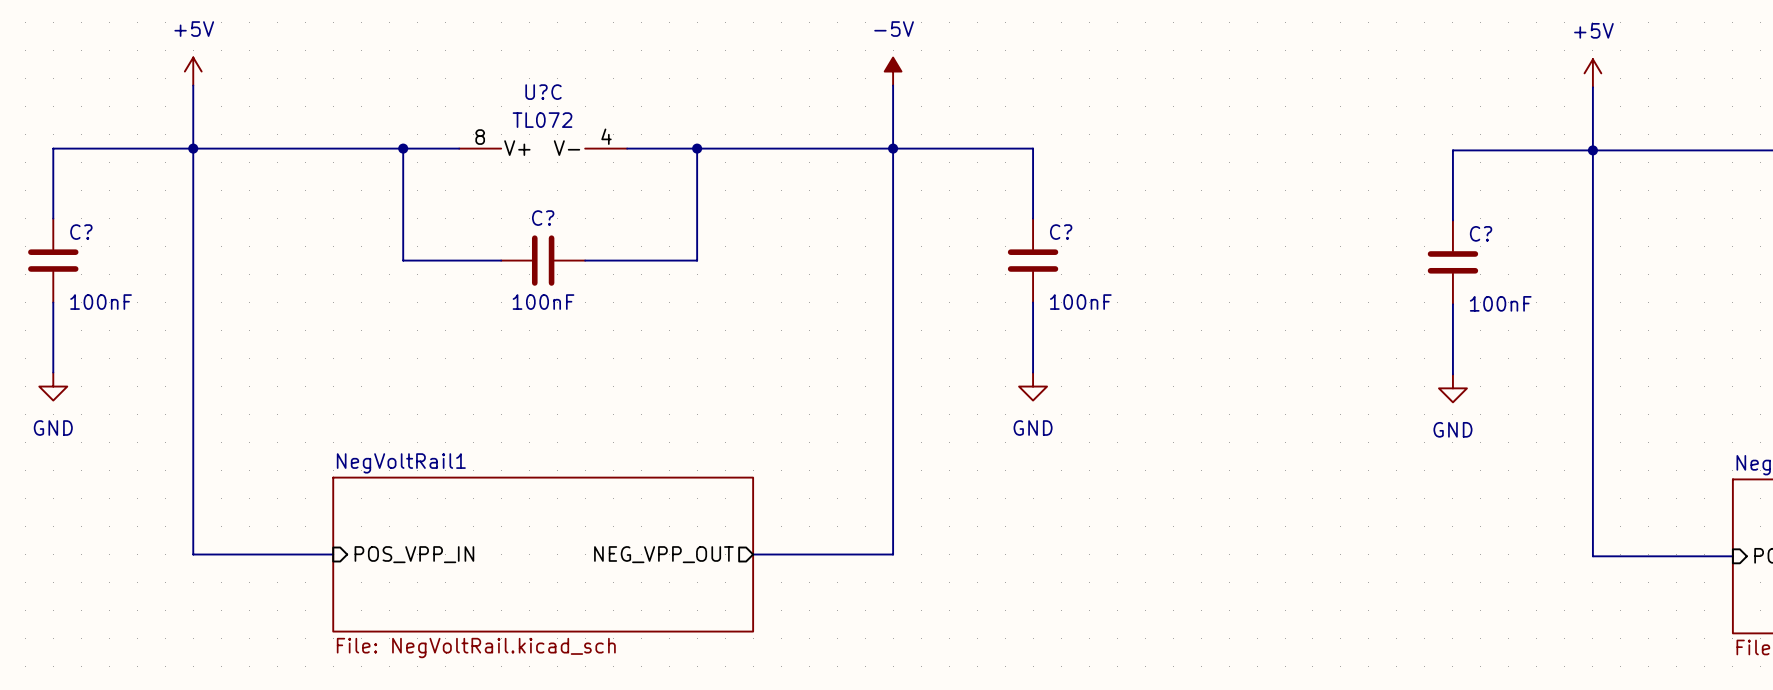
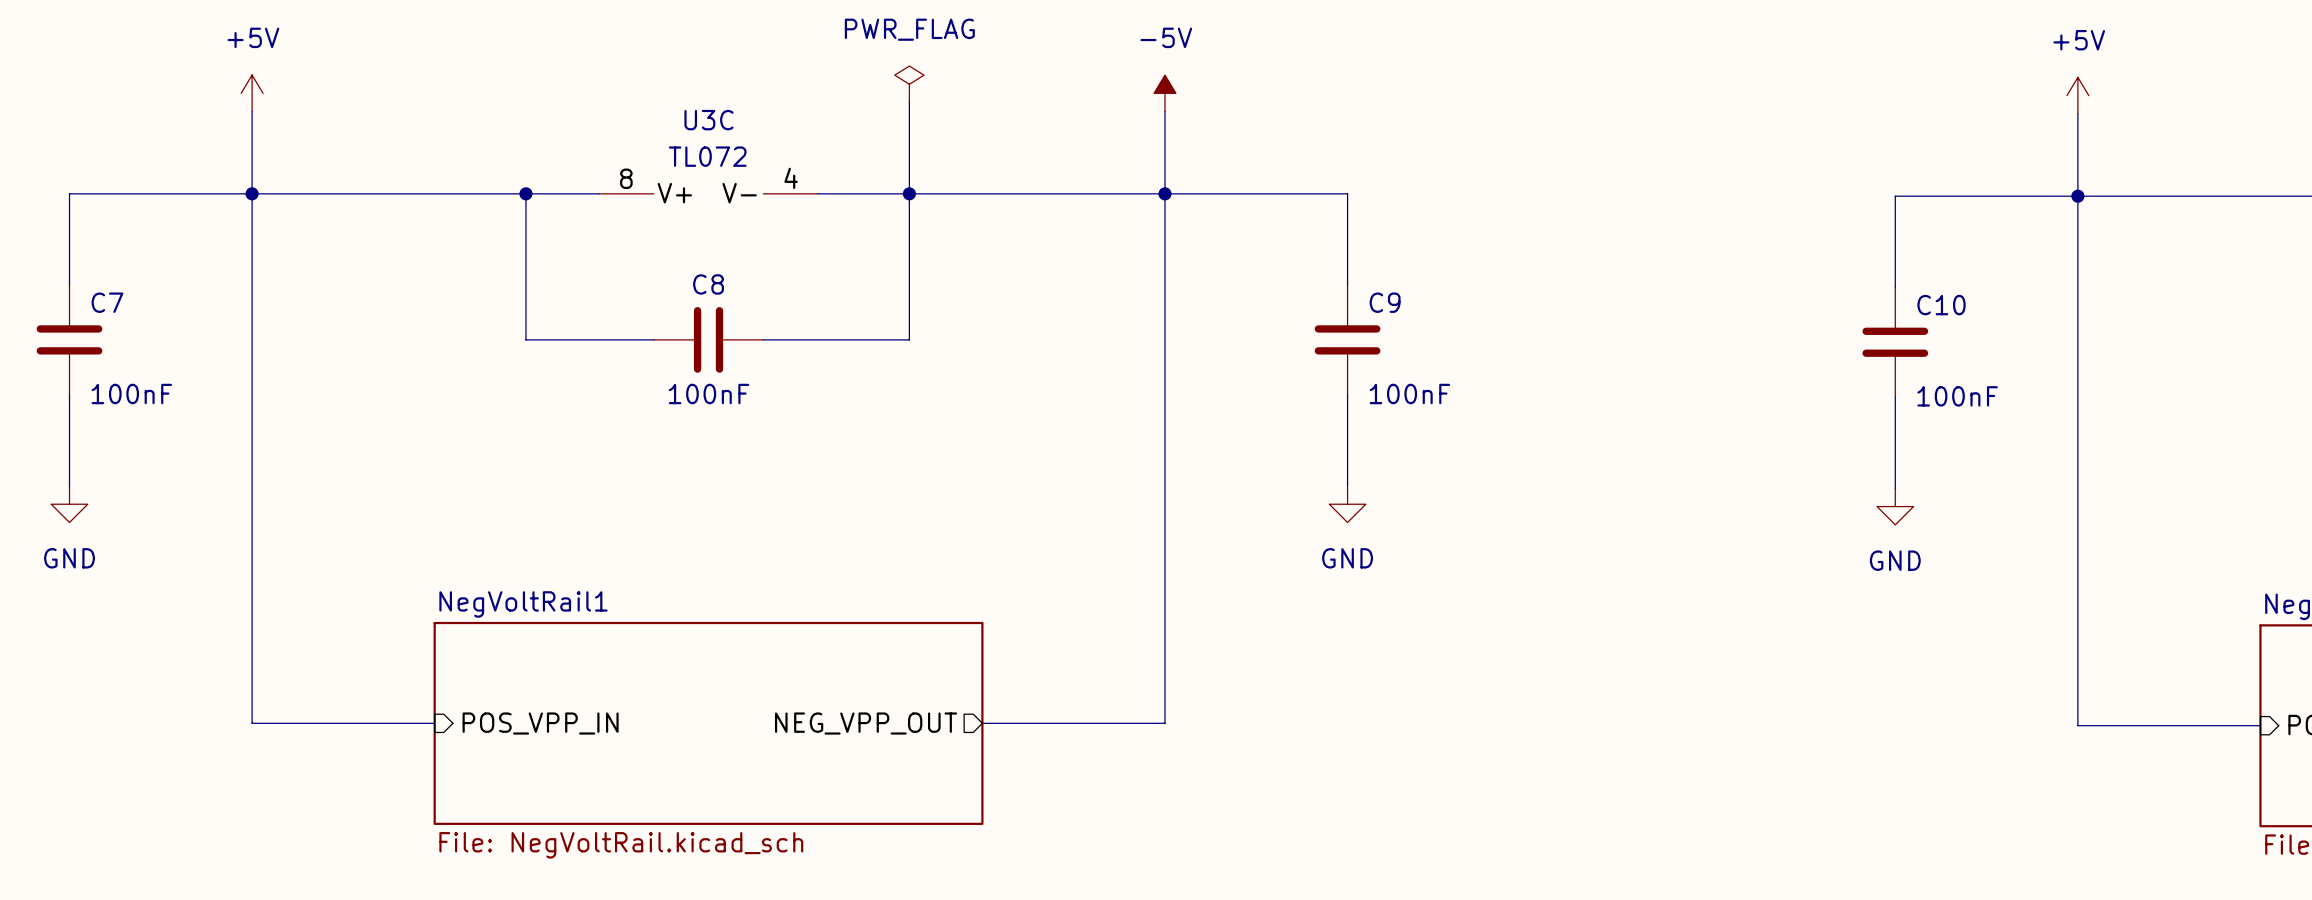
power symbol: none -> PWR_FLAG (909, 84)
wire: none -> (909, 102) (909, 193)
U?C name: U?C (543, 92) -> U3C (708, 120)
C? name: C? (543, 218) -> C8 (708, 284)
C? name: C? (81, 232) -> C7 (107, 302)
C? name: C? (1061, 232) -> C9 (1385, 302)
C? name: C? (1481, 233) -> C10 (1941, 305)

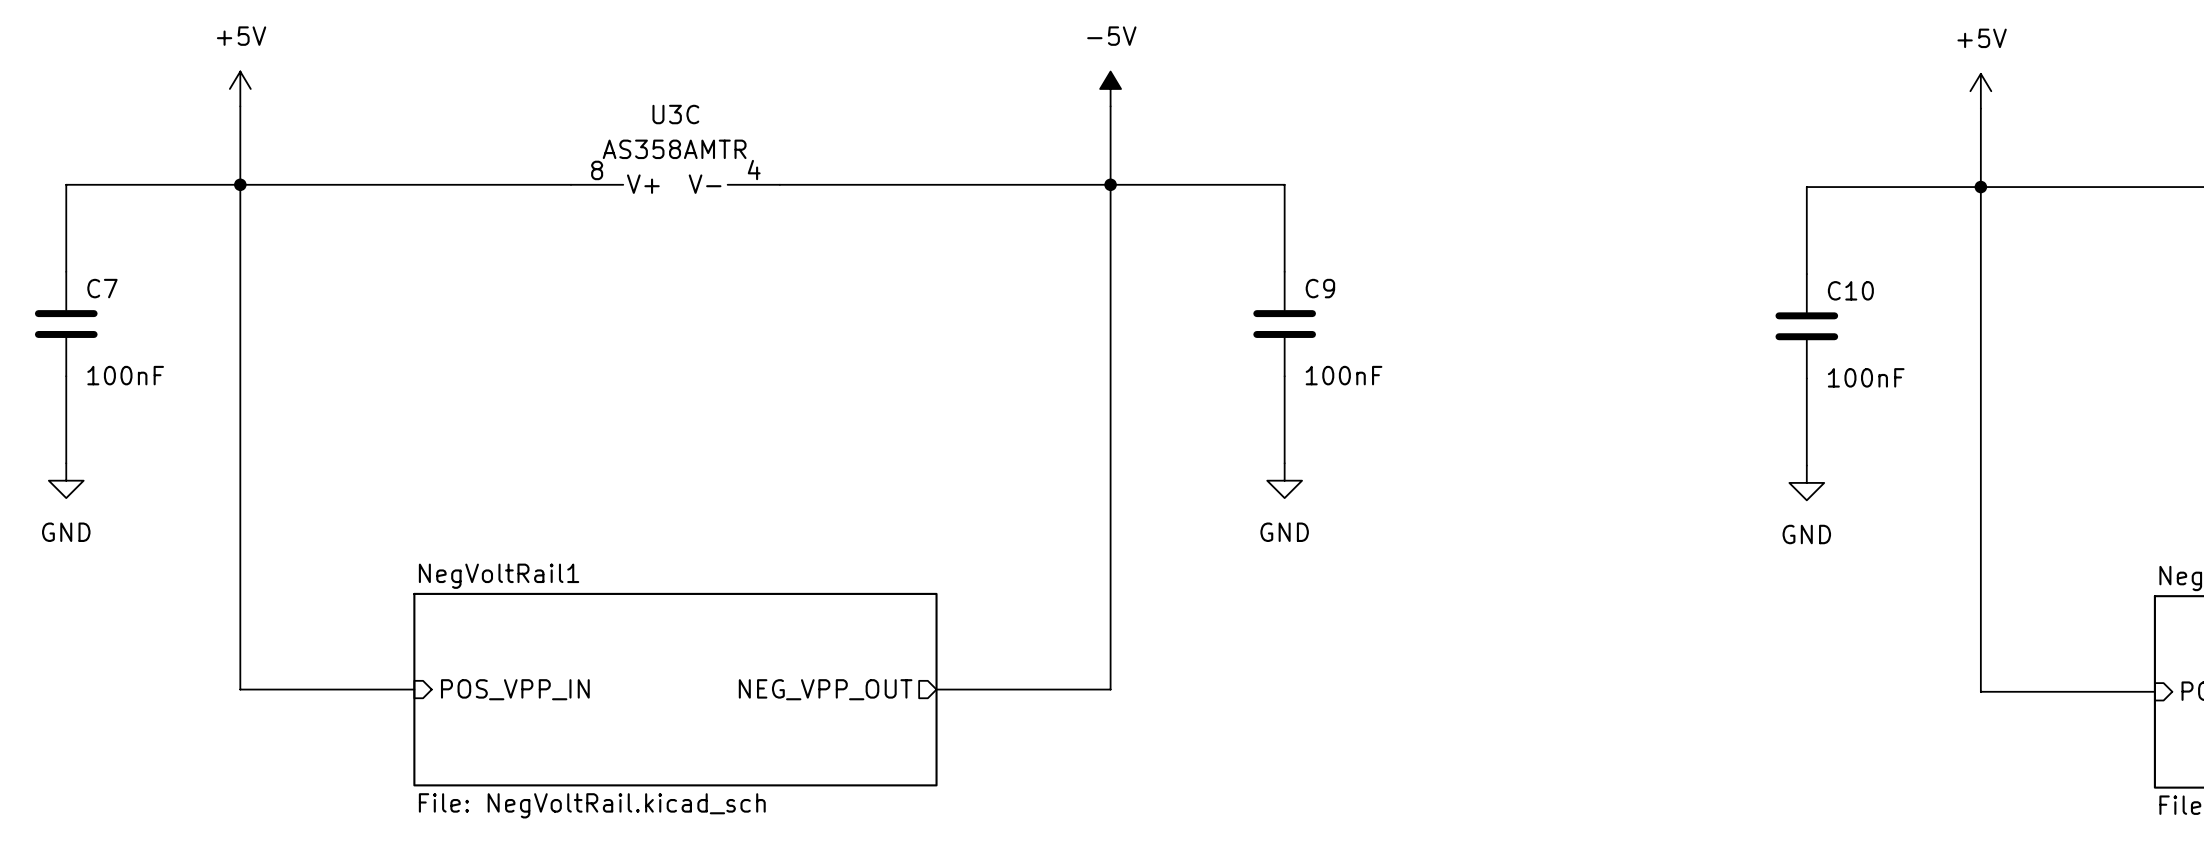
power symbol: PWR_FLAG (909, 84) -> none
wire: (909, 102) (909, 339) (763, 339) -> none
U3C value: TL072 (707, 156) -> AS358AMTR (674, 149)
wire: (525, 193) (525, 339) (653, 339) -> none
junction: (525, 193) -> none
junction: (909, 193) -> none
C8: 100nF (708, 339) -> none

